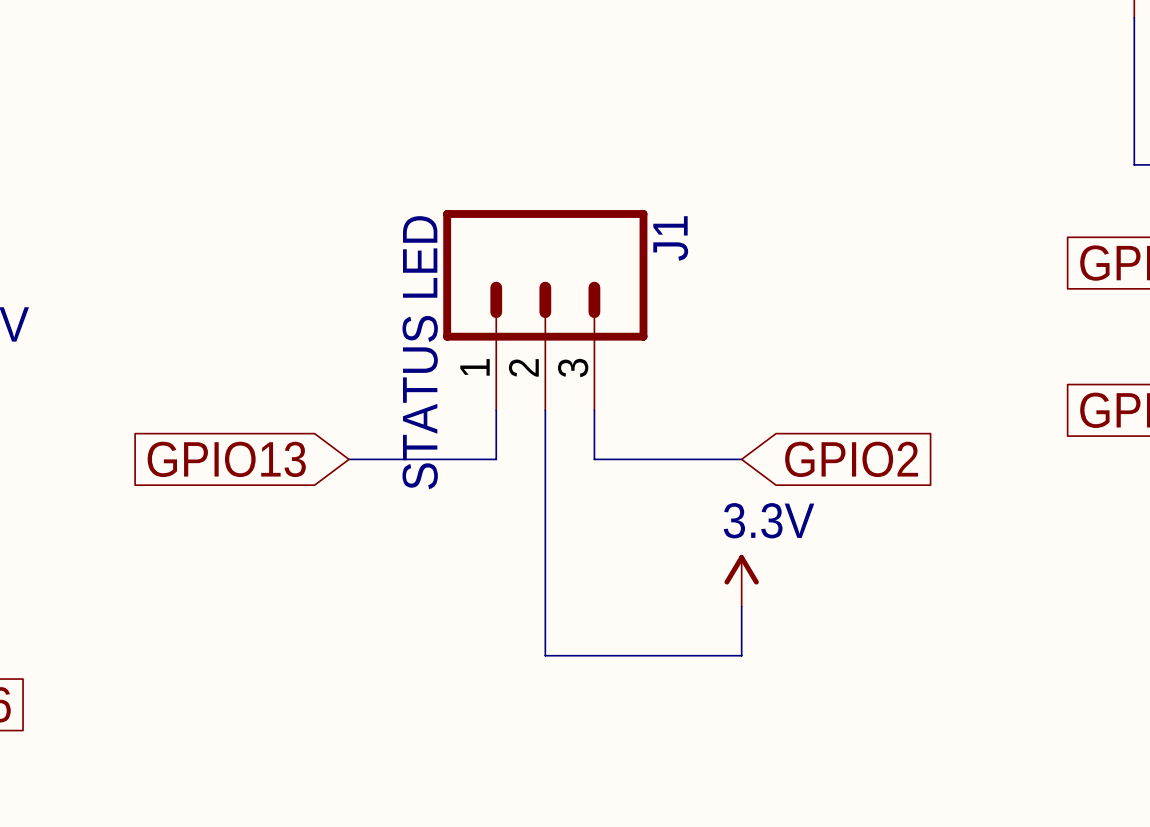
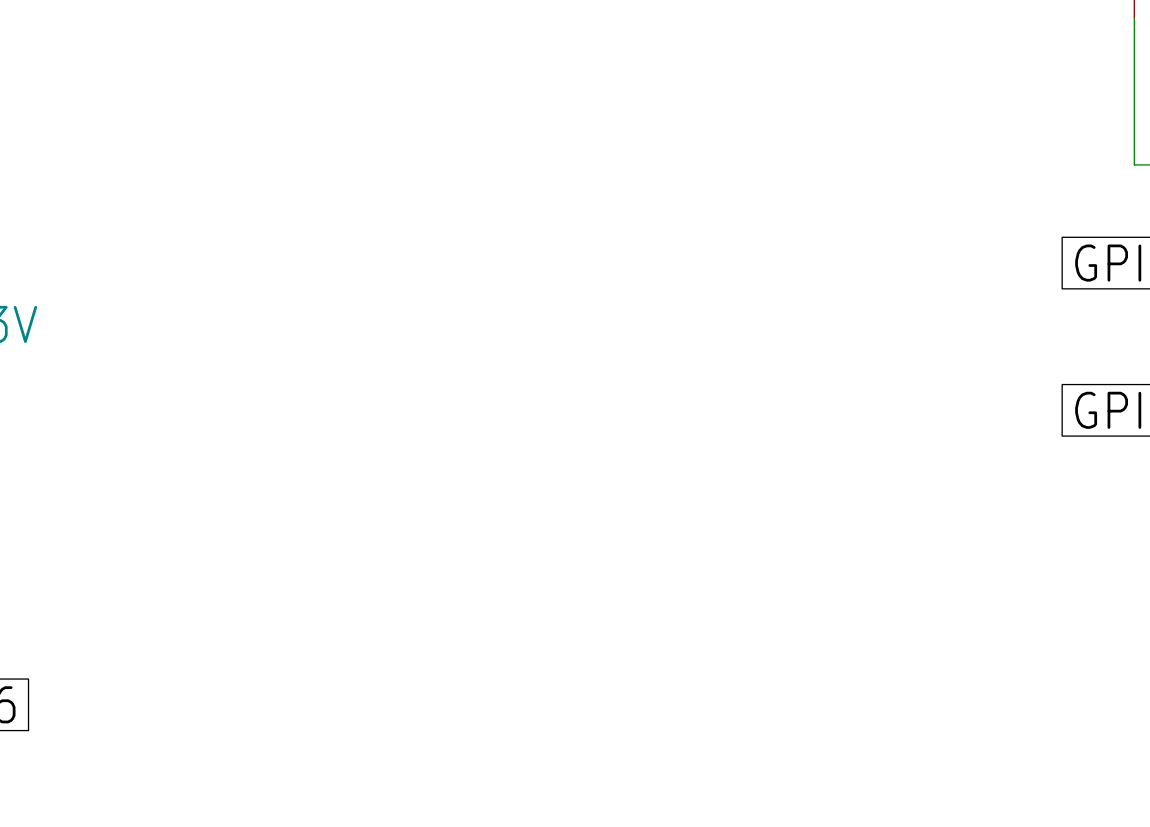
J1: STATUS LED (545, 310) -> none
wire: (496, 410) (496, 459) (349, 459) -> none
wire: (545, 410) (545, 655) (741, 655) (741, 606) -> none
wire: (594, 410) (594, 459) (741, 459) -> none
global label: GPIO13 (226, 459) -> none
global label: GPIO2 (851, 459) -> none
power symbol: 3.3V (741, 580) -> none

